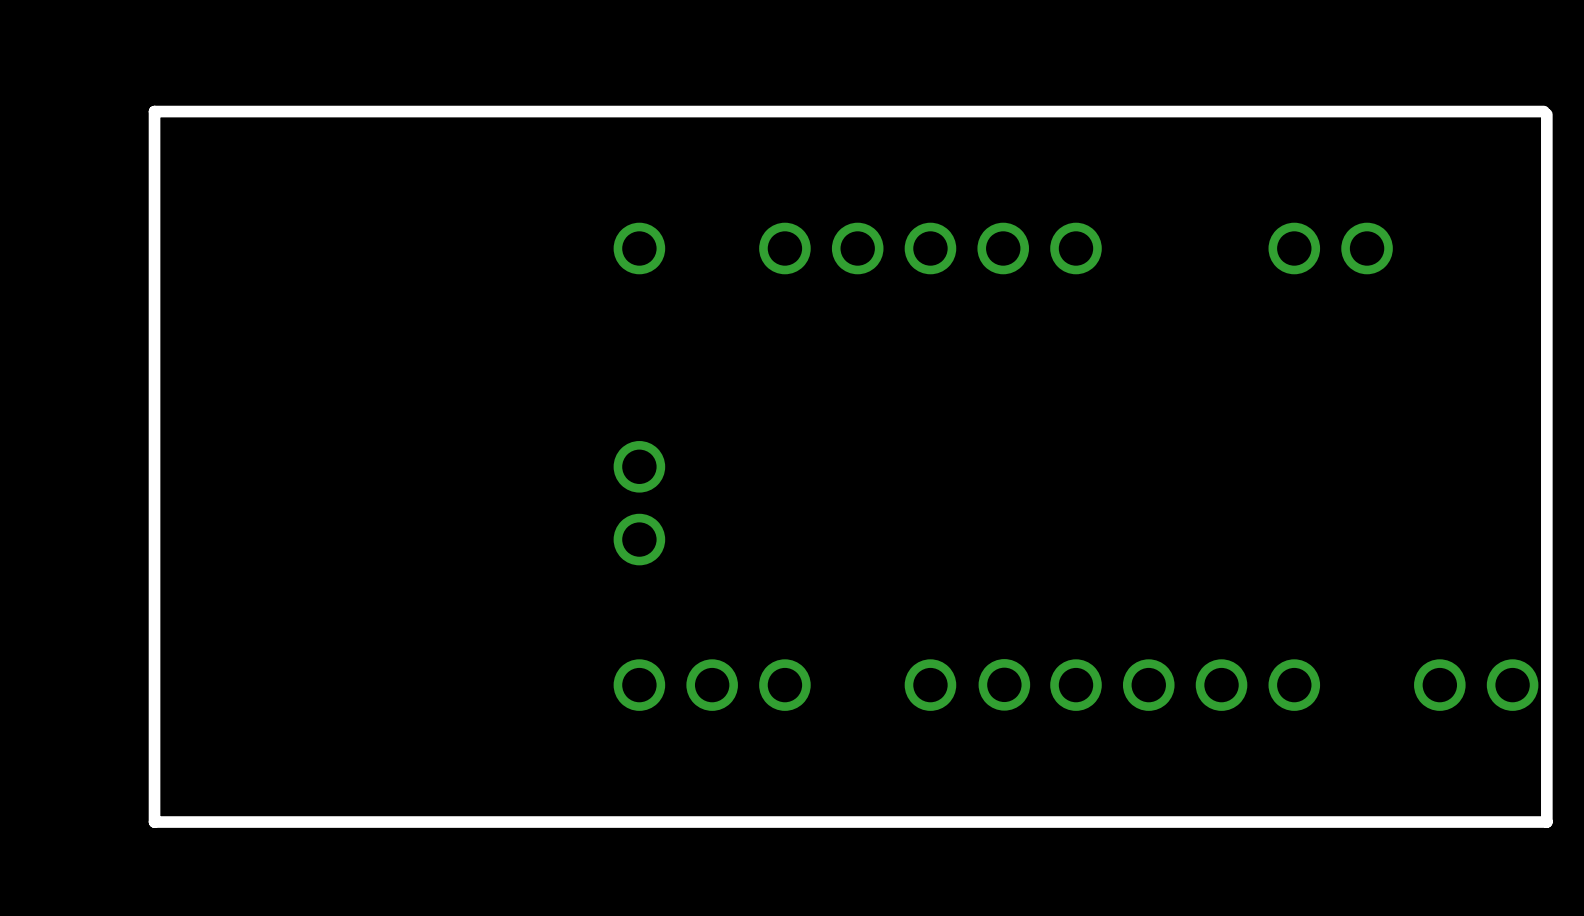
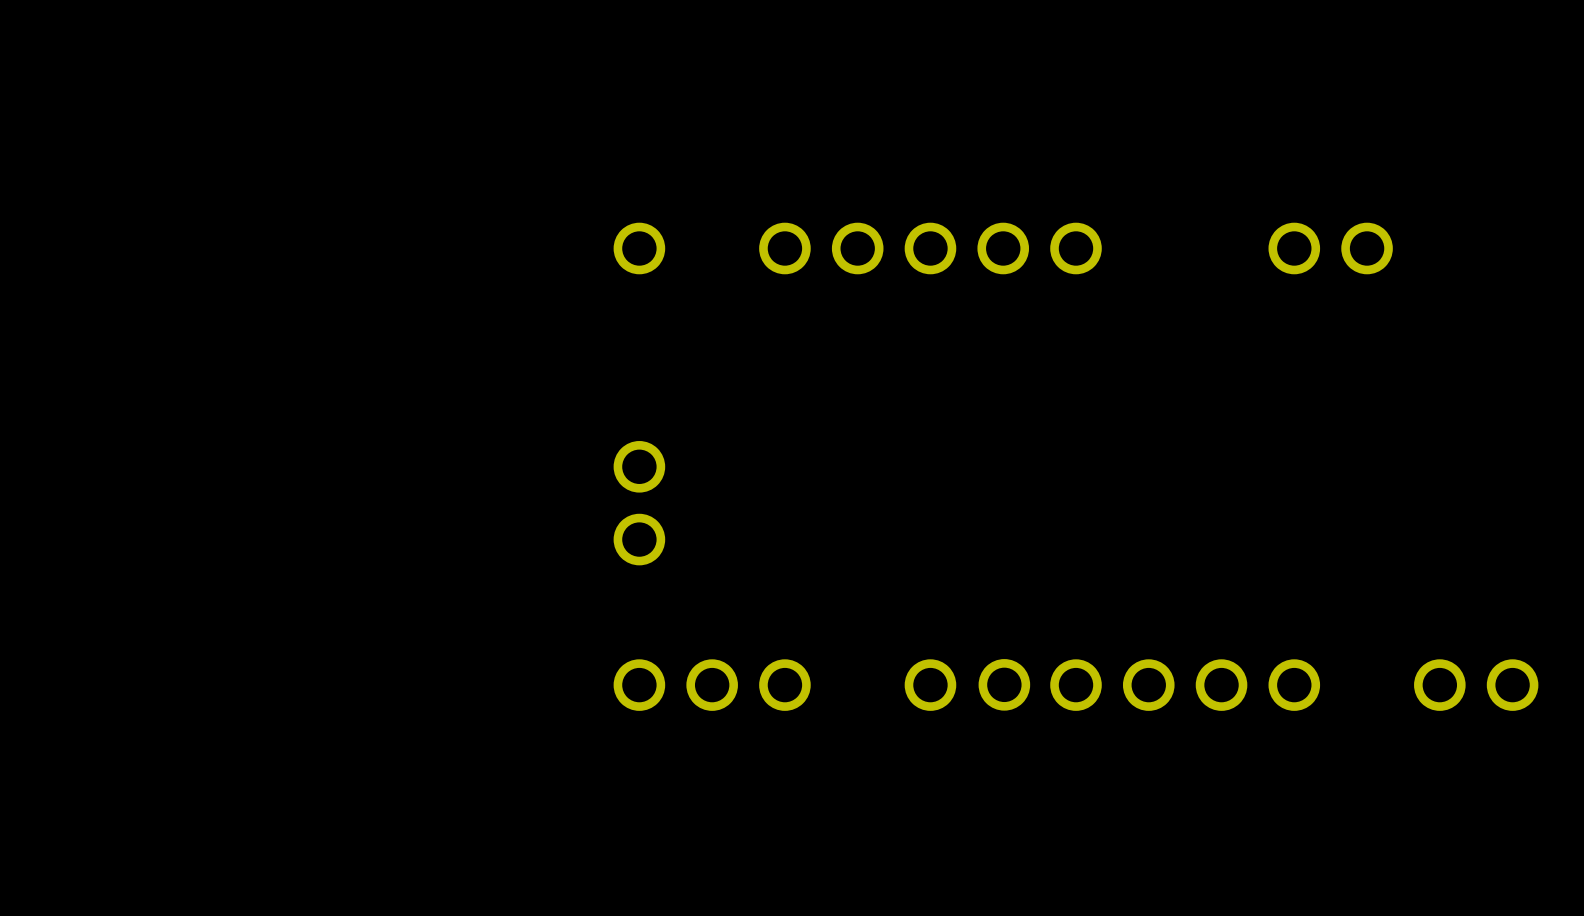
board edge: (1543, 111) (154, 111) (154, 822) (1546, 822) (1546, 114) -> none

